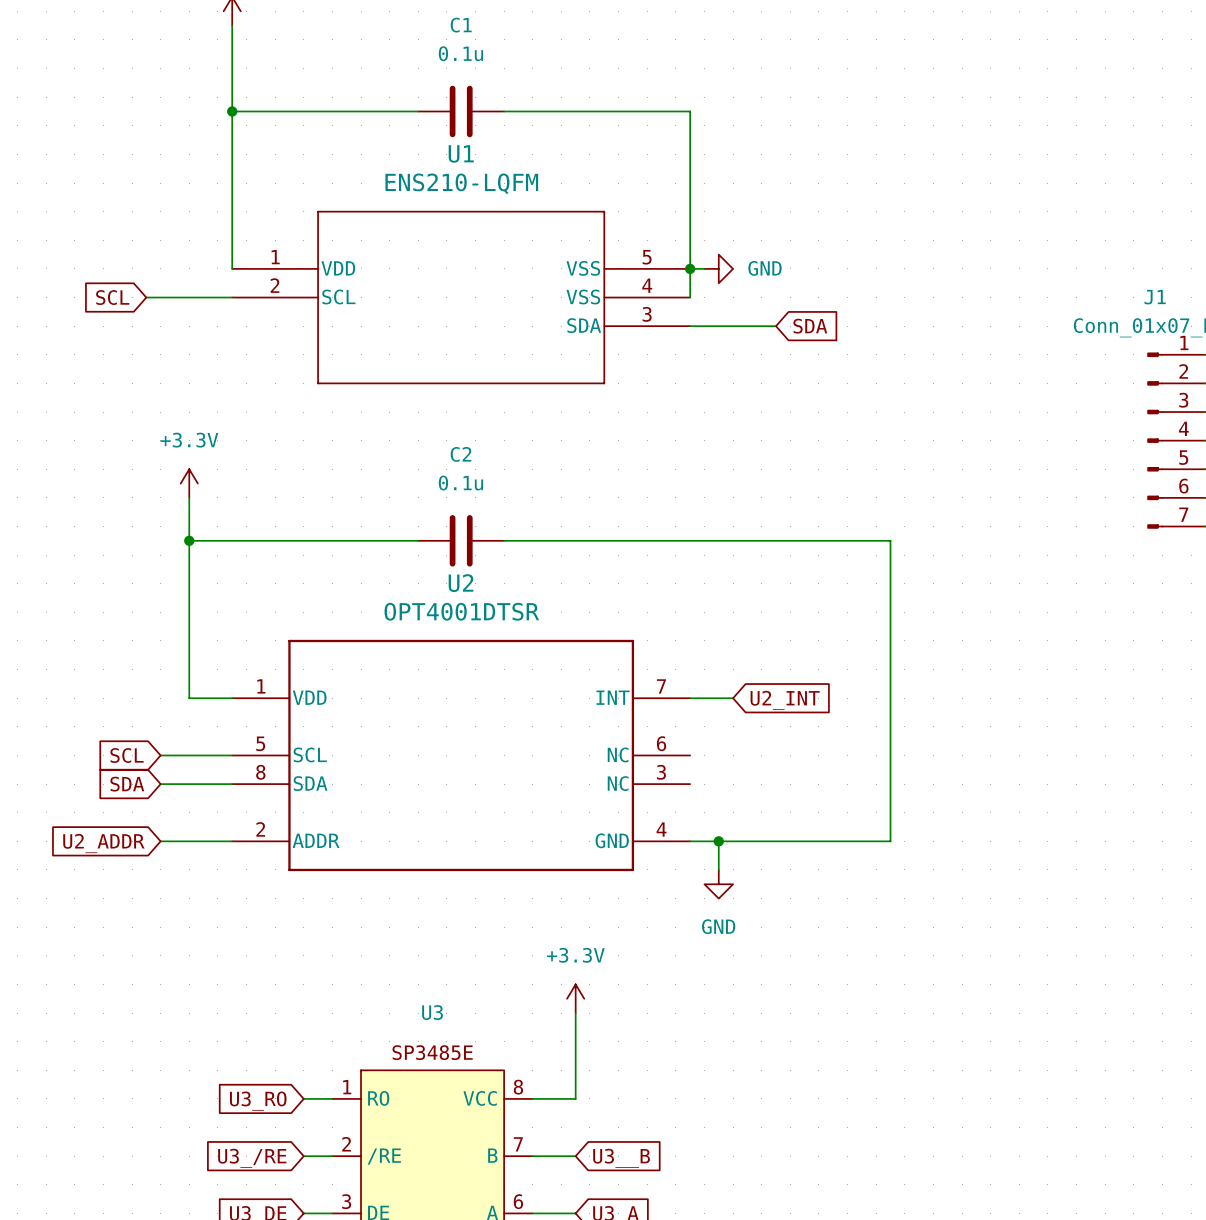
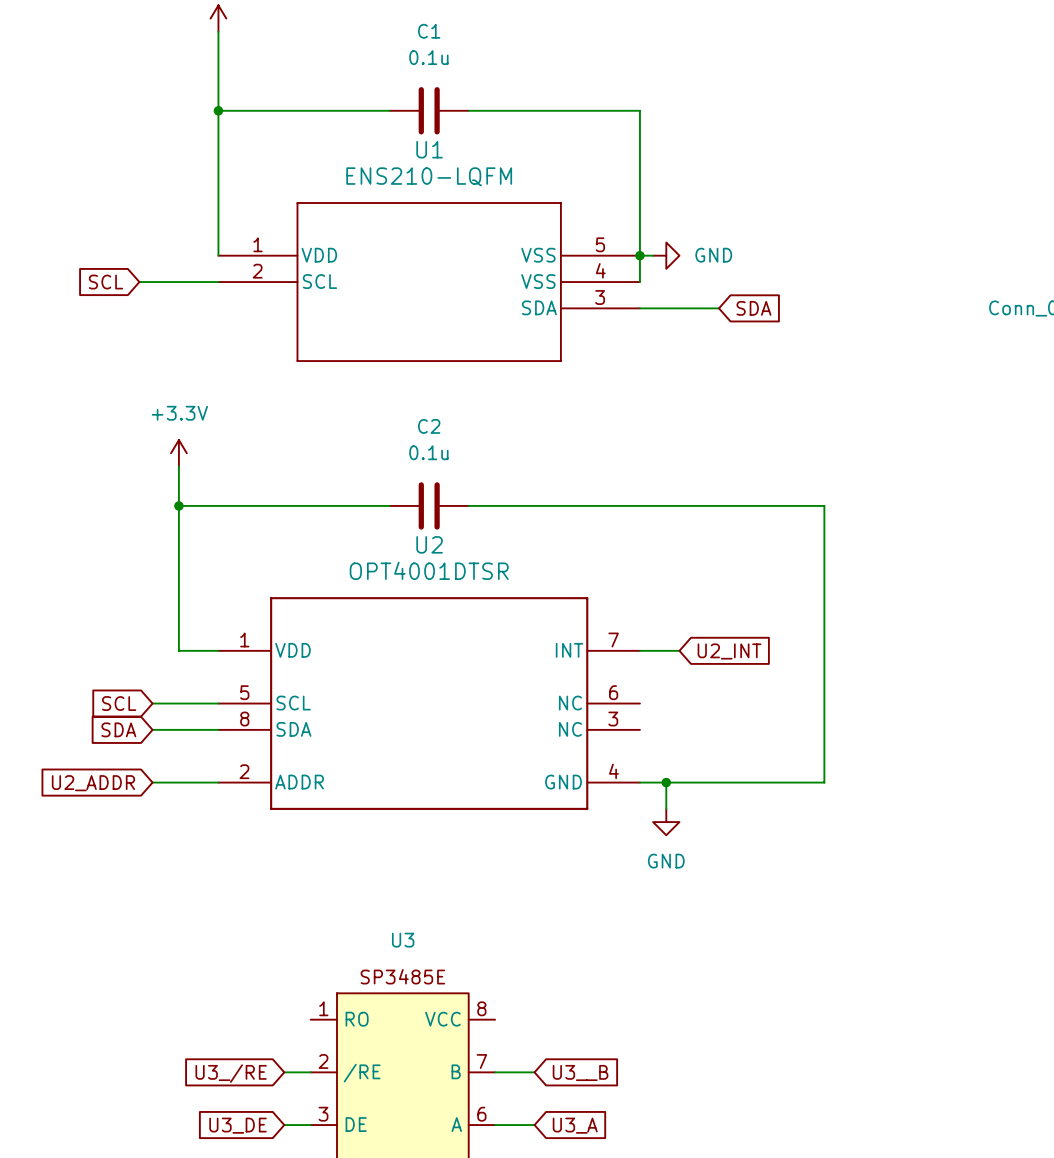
power symbol: +3.3V (575, 998) -> none
wire: (575, 1013) (575, 1098) (532, 1098) -> none
wire: (303, 1098) (332, 1098) -> none
global label: U3_RO (258, 1101) -> none

